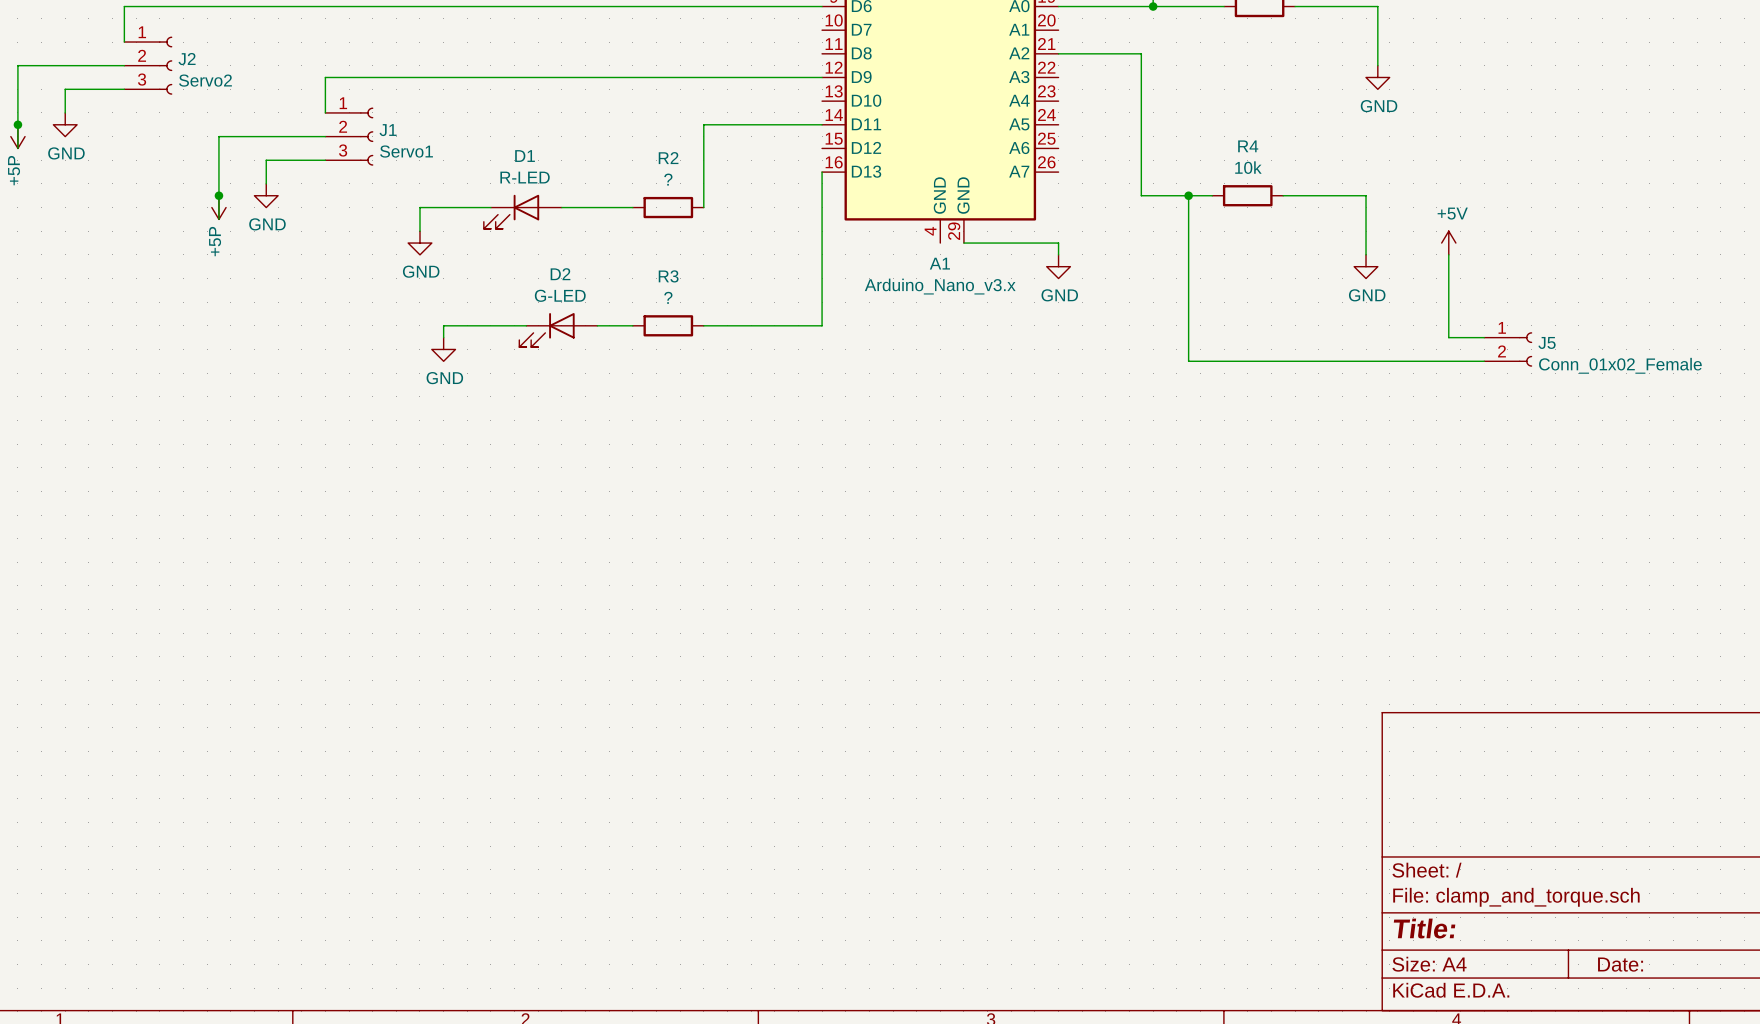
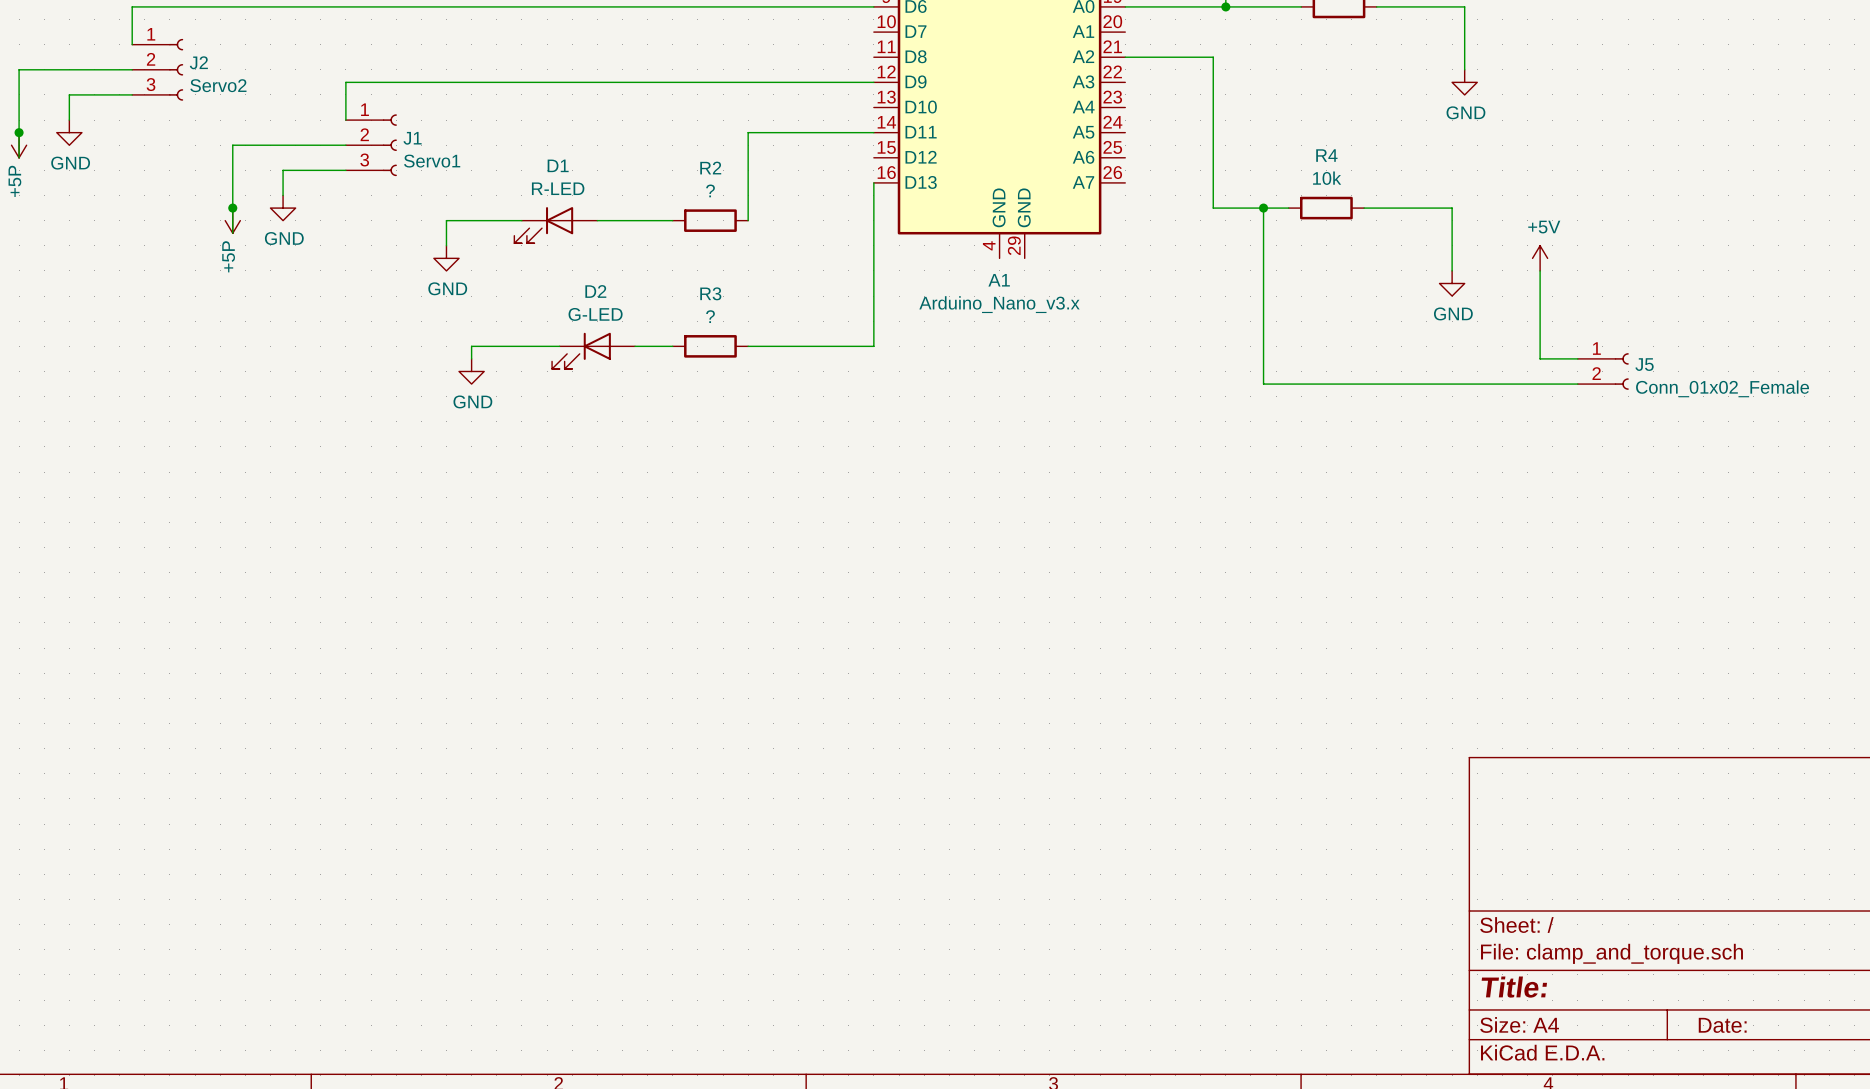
wire: (963, 243) (1058, 243) (1058, 254) -> none
power symbol: GND (1058, 266) -> none

